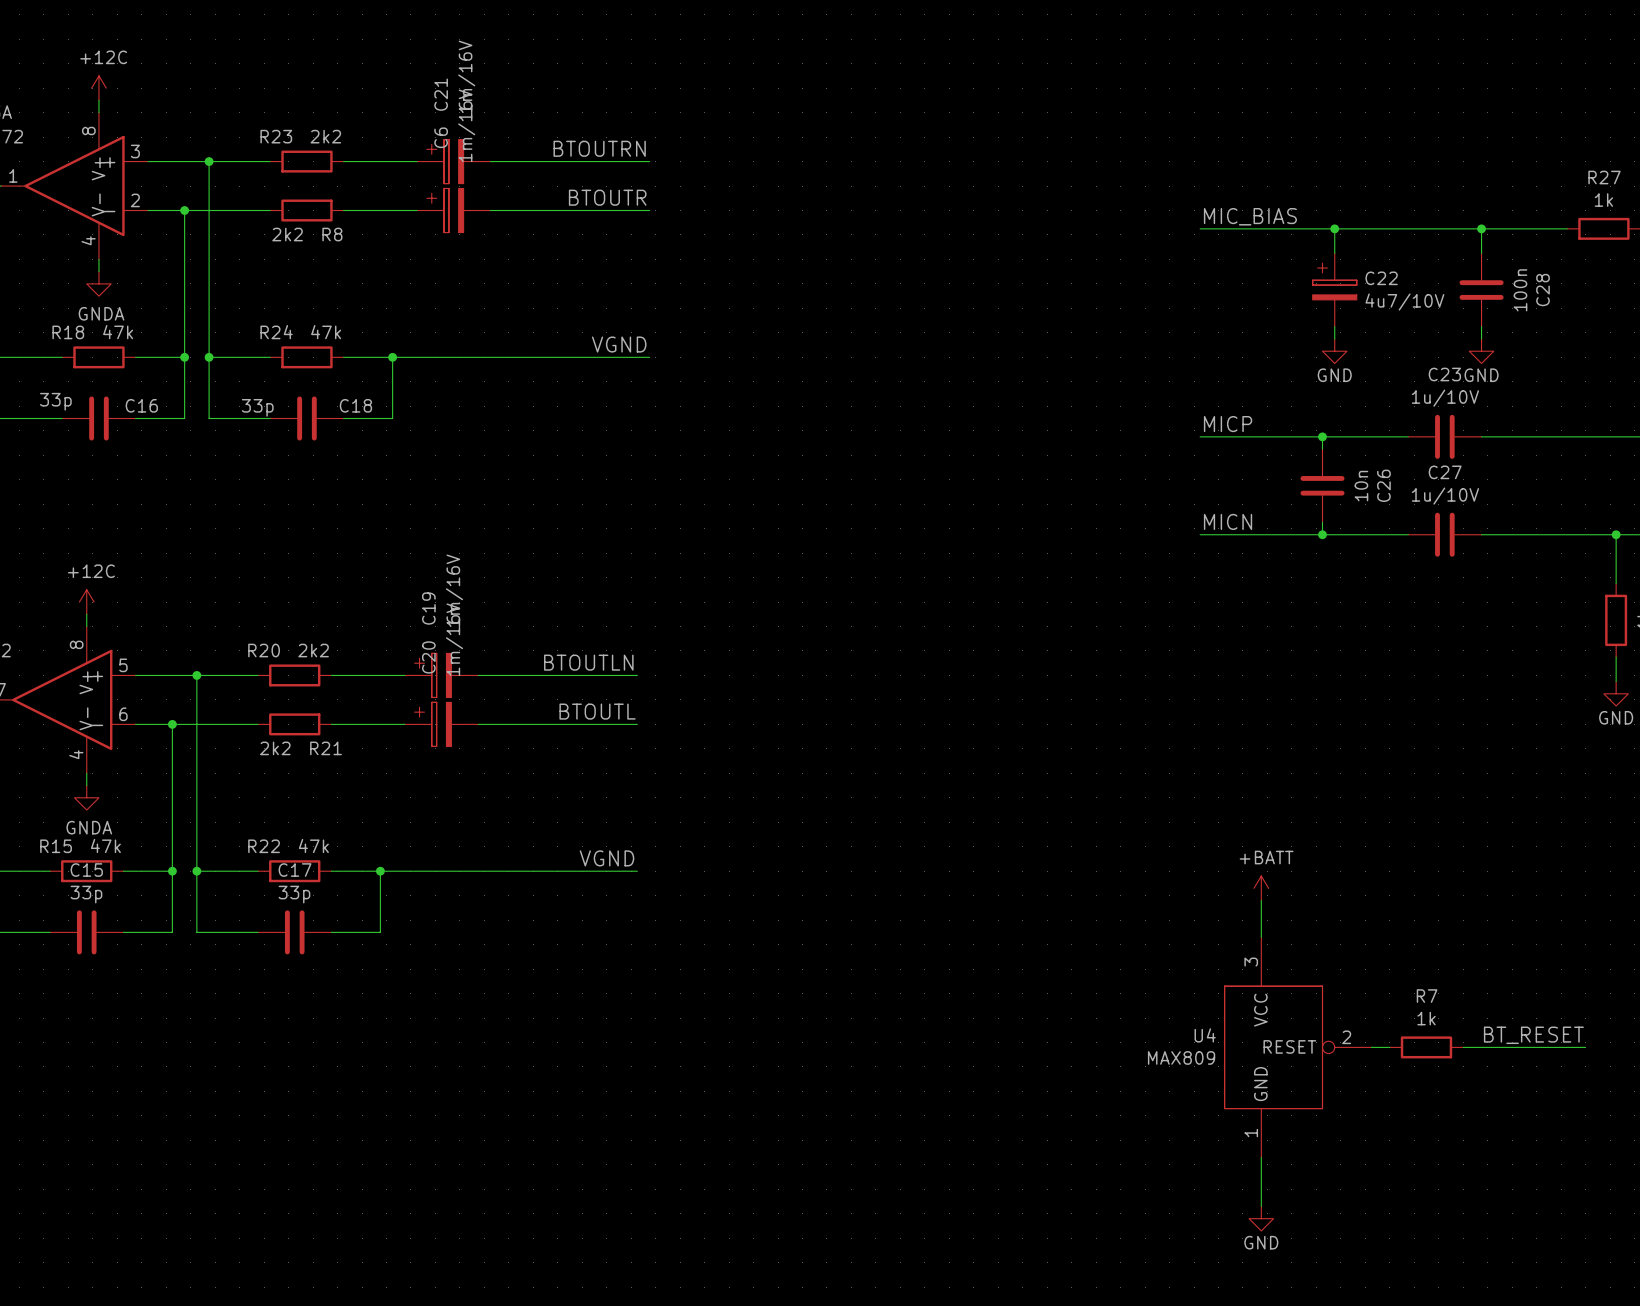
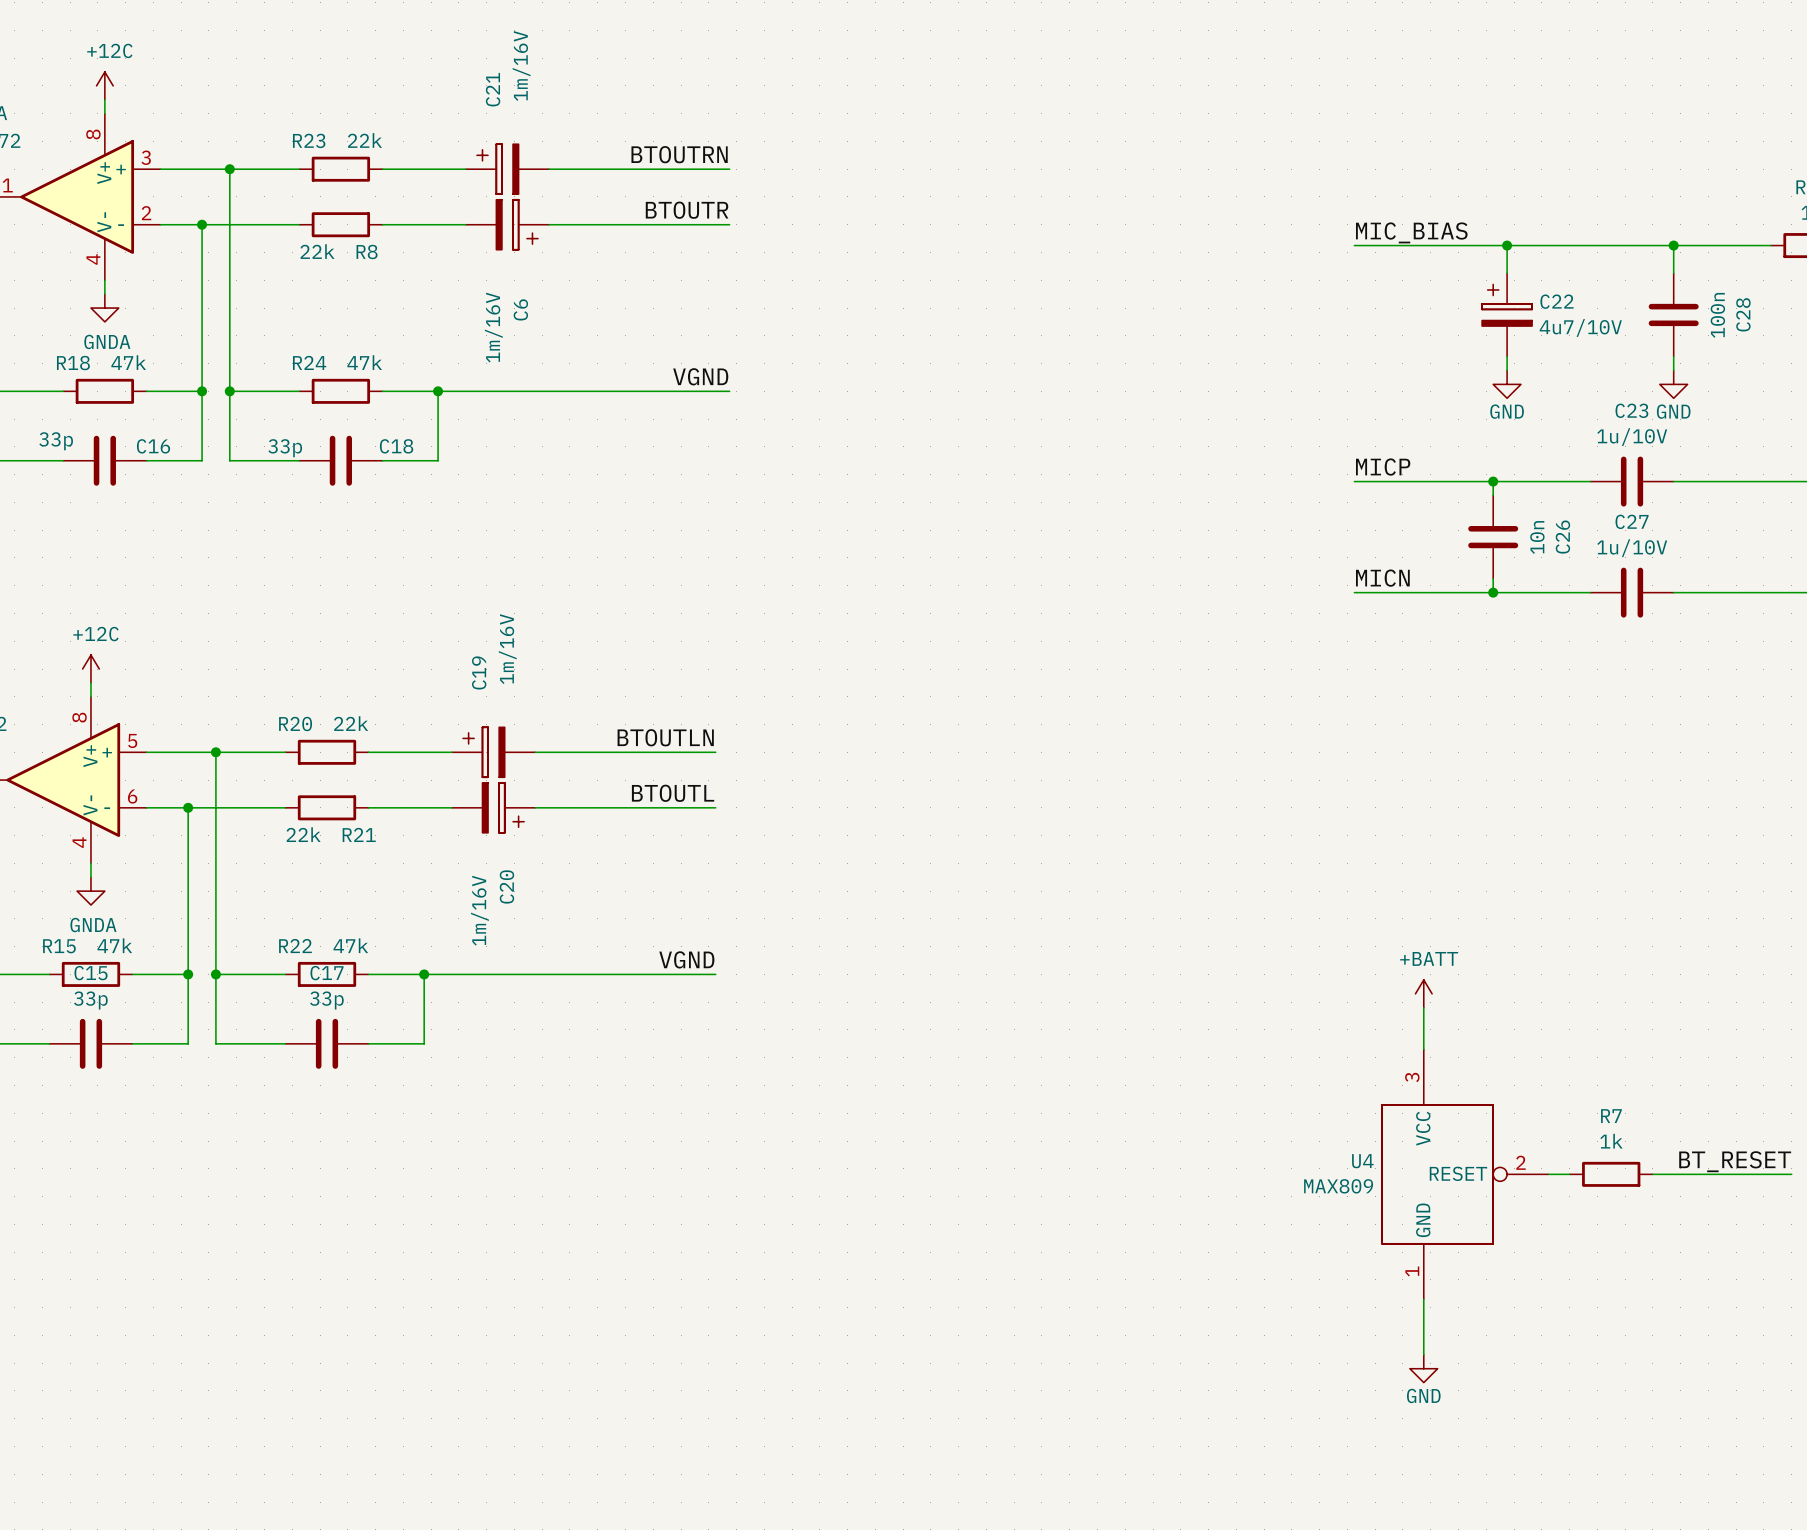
R23 value: 2k2 (325, 136) -> 22k (365, 140)
C6 rotation: 0° (445, 210) -> 180° (517, 224)
R8 value: 2k2 (287, 234) -> 22k (317, 251)
R20 value: 2k2 (313, 650) -> 22k (351, 723)
C20 rotation: 0° (433, 724) -> 180° (503, 807)
R21 value: 2k2 (275, 748) -> 22k (303, 834)

